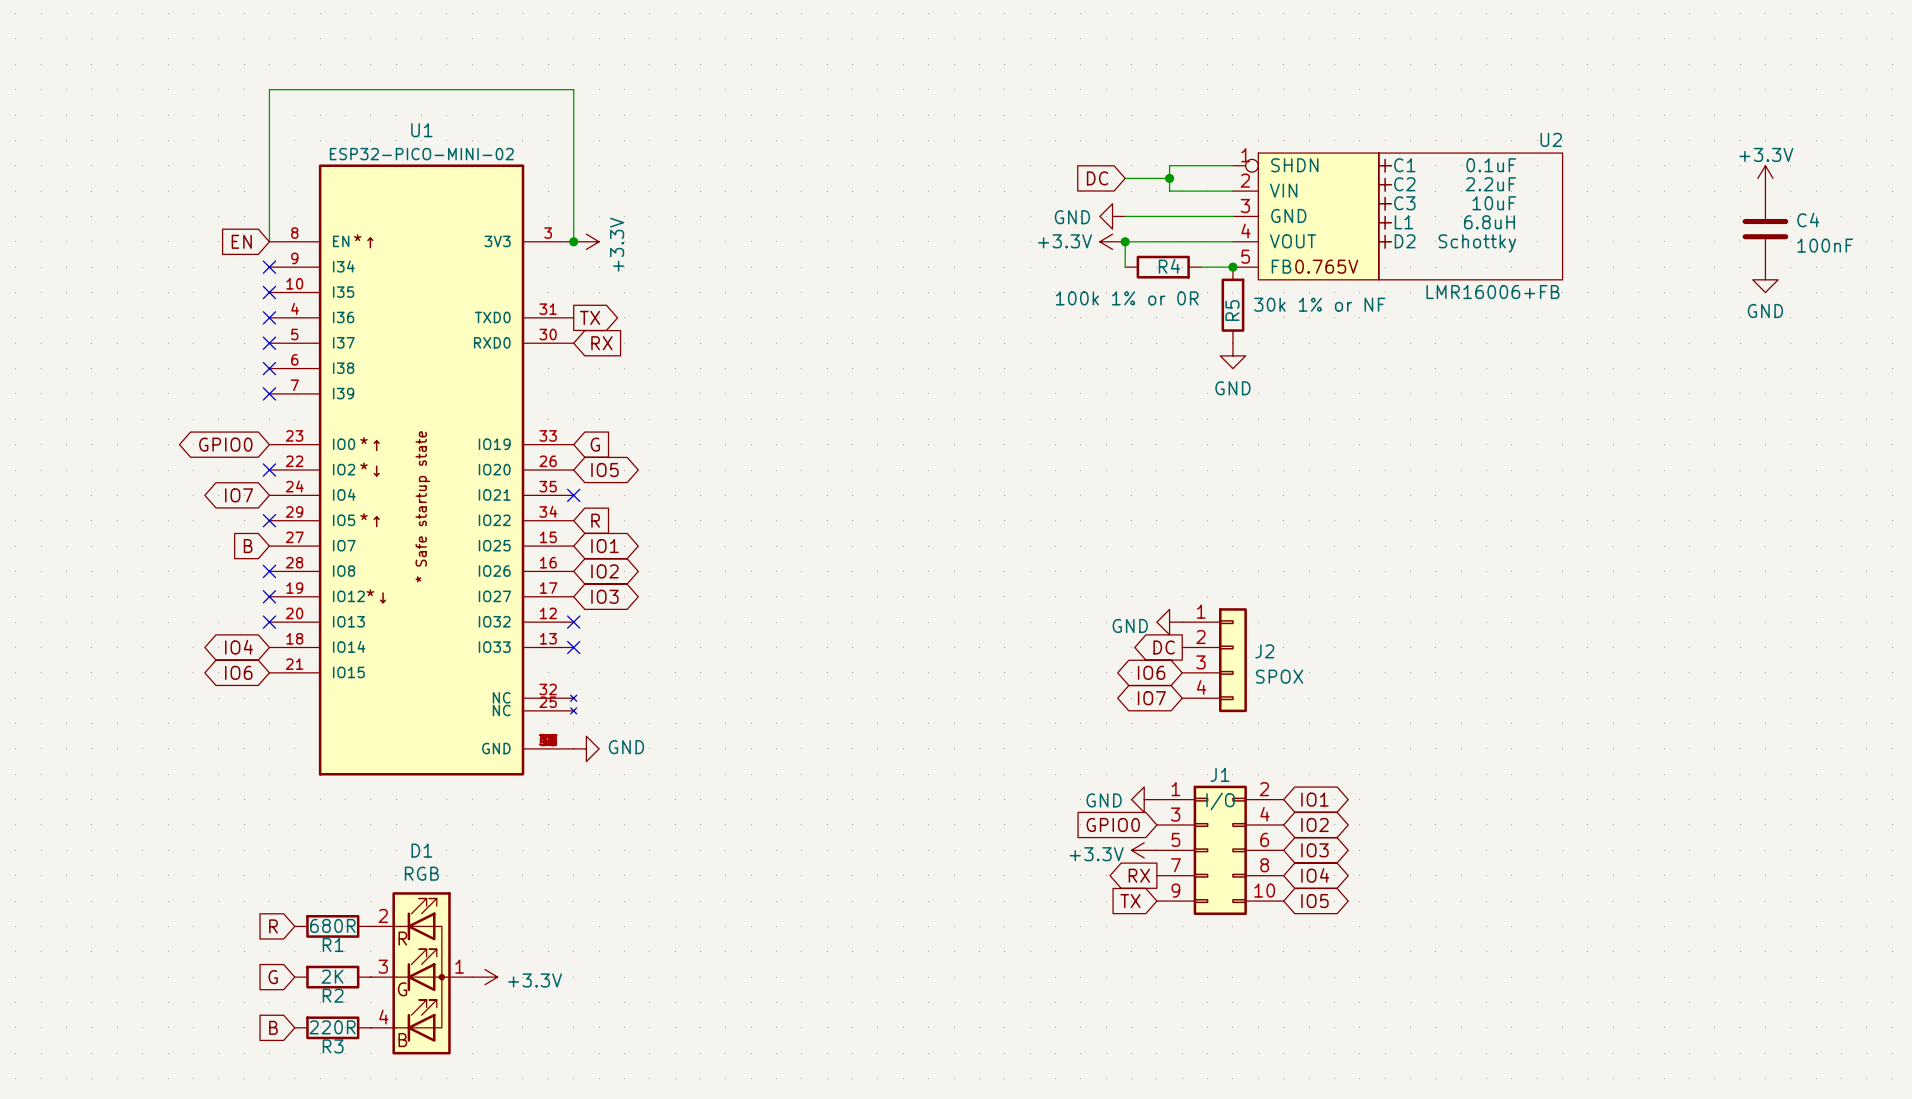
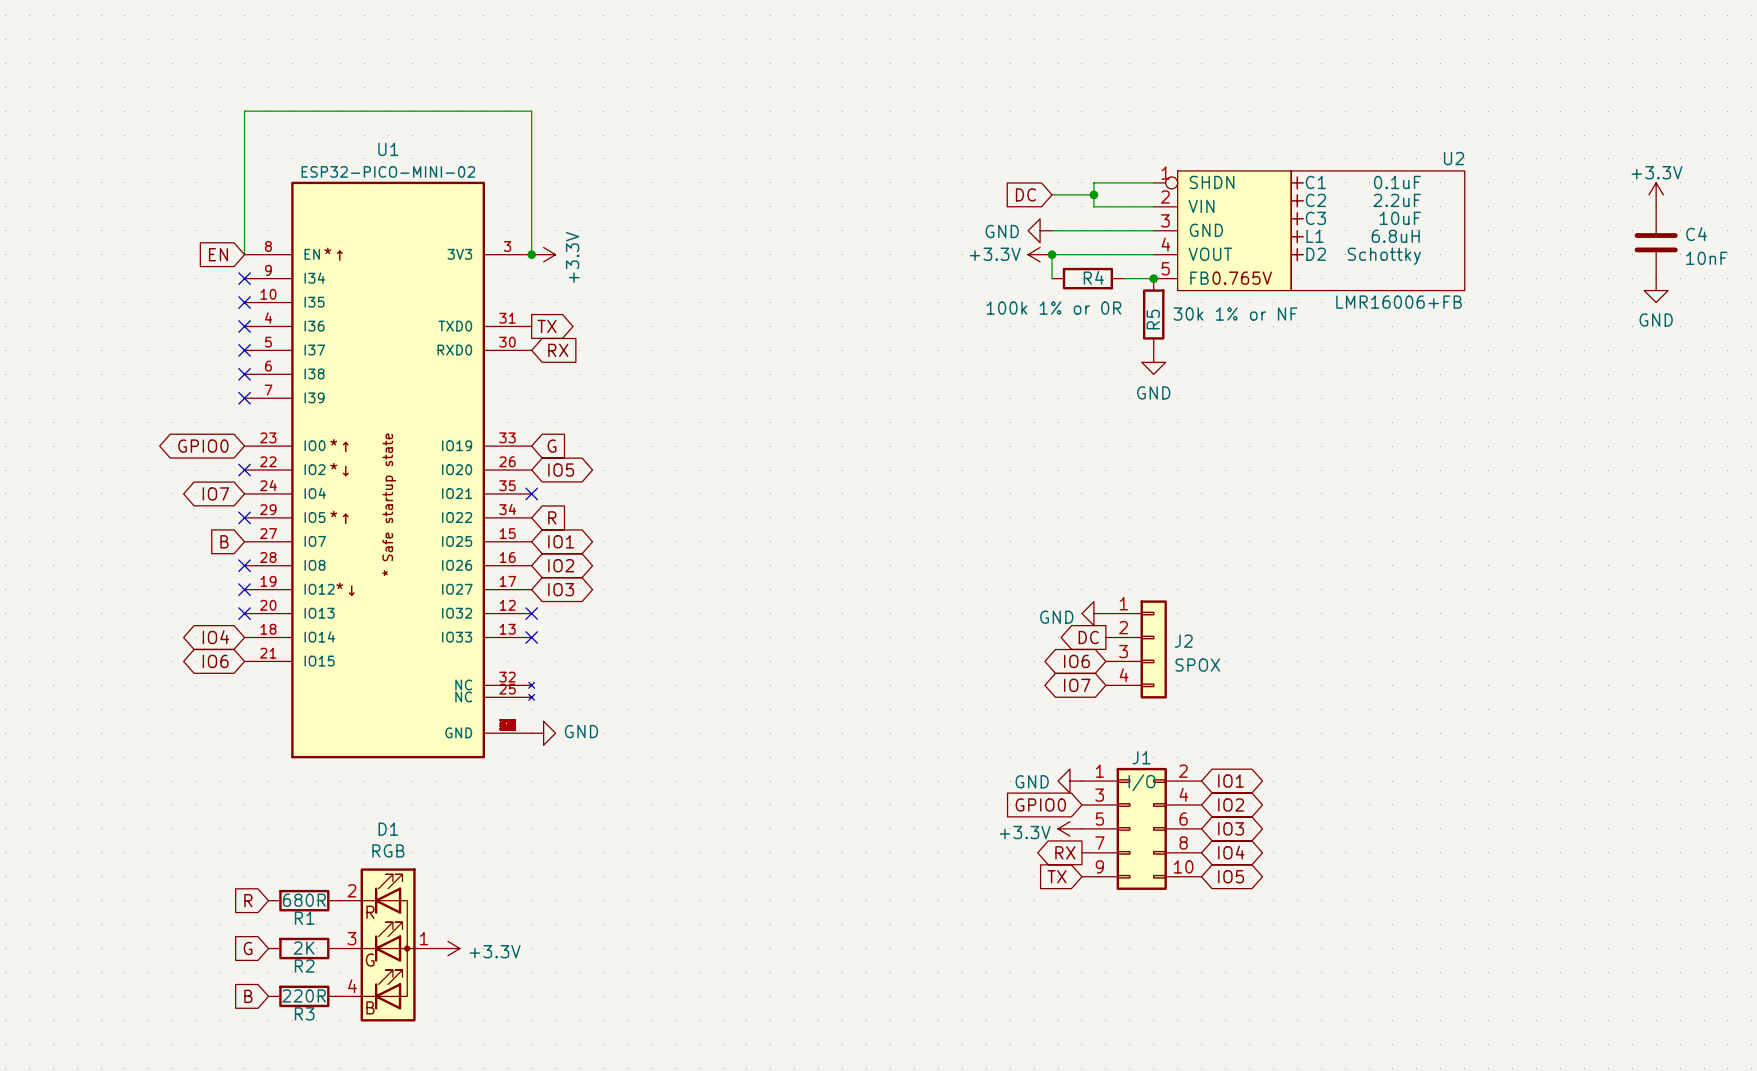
C4 value: 100nF (1825, 245) -> 10nF (1706, 258)

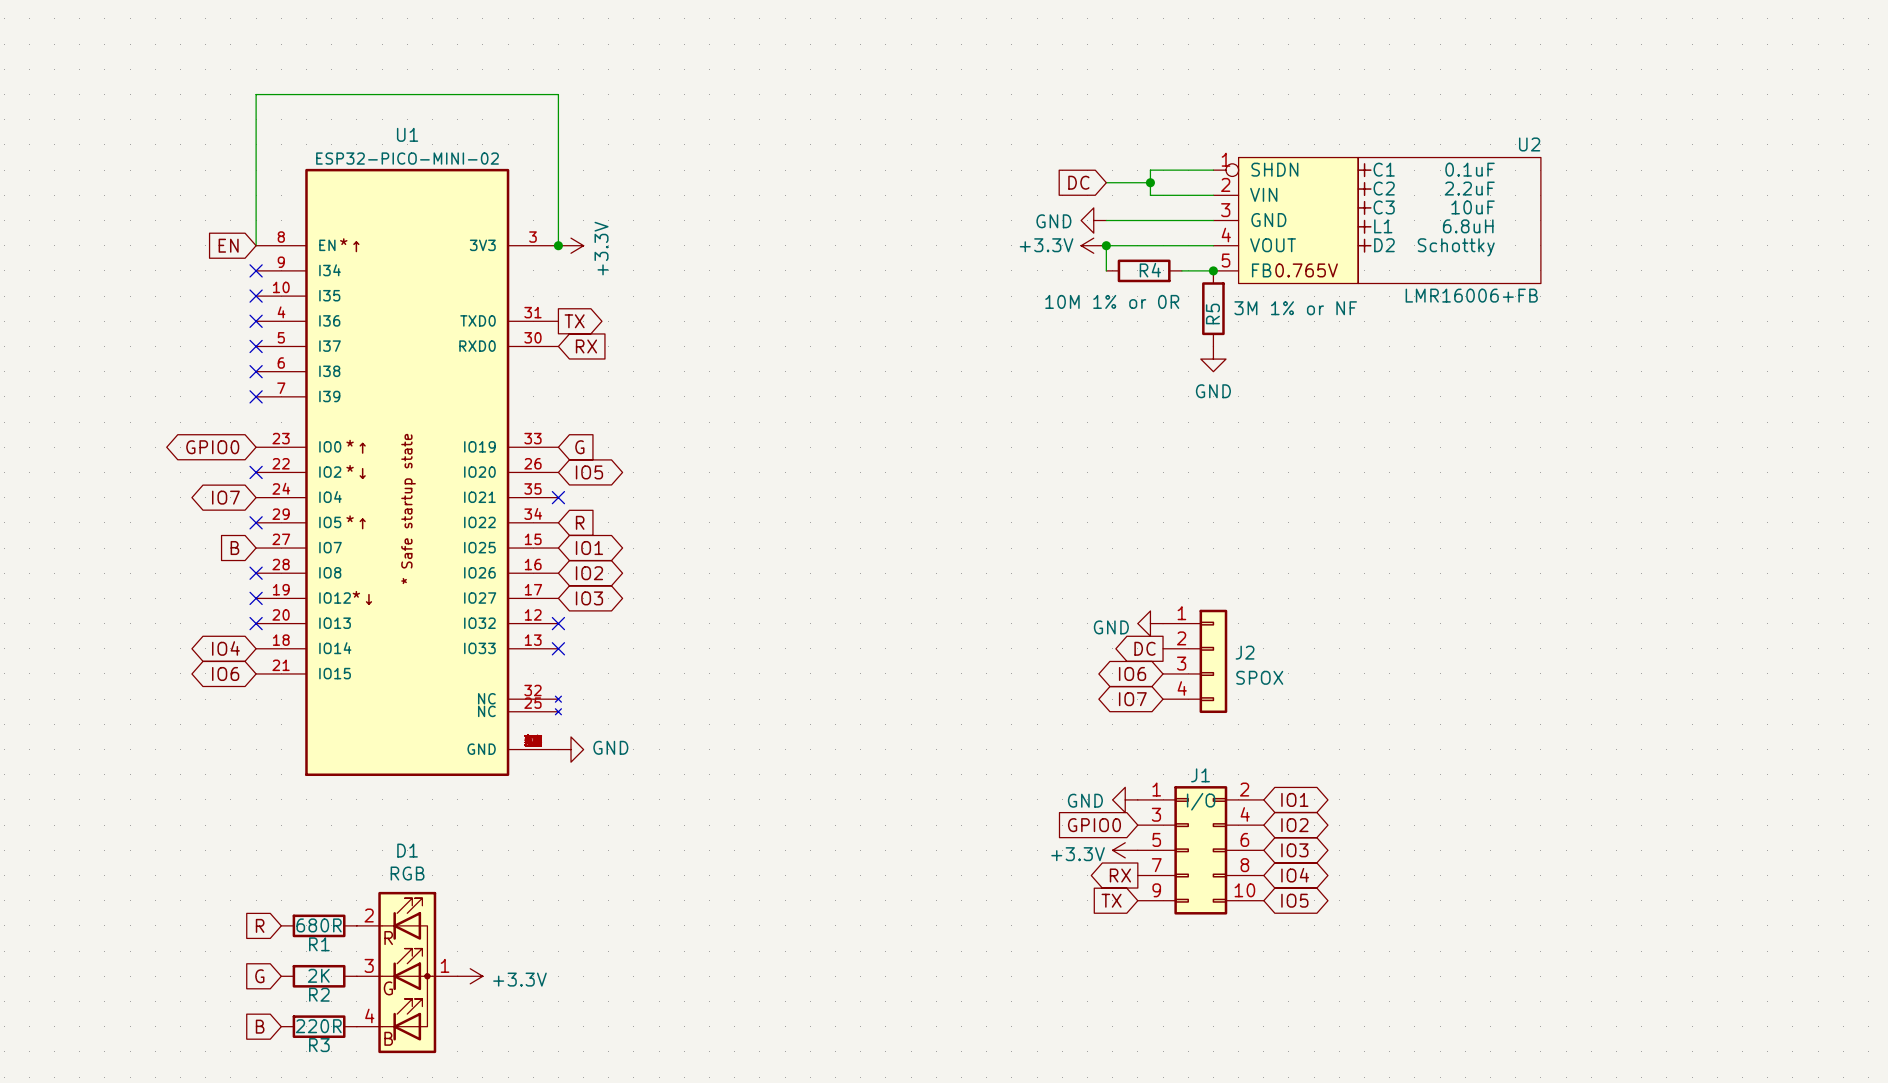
power symbol: +3.3V (1656, 194) -> none
C4: 10nF (1656, 242) -> none
power symbol: GND (1656, 290) -> none
R4 value: 100k 1% or 0R (1053, 308) -> 10M 1% or 0R (1112, 301)
R5 value: 30k 1% or NF (1235, 314) -> 3M 1% or NF (1295, 308)

